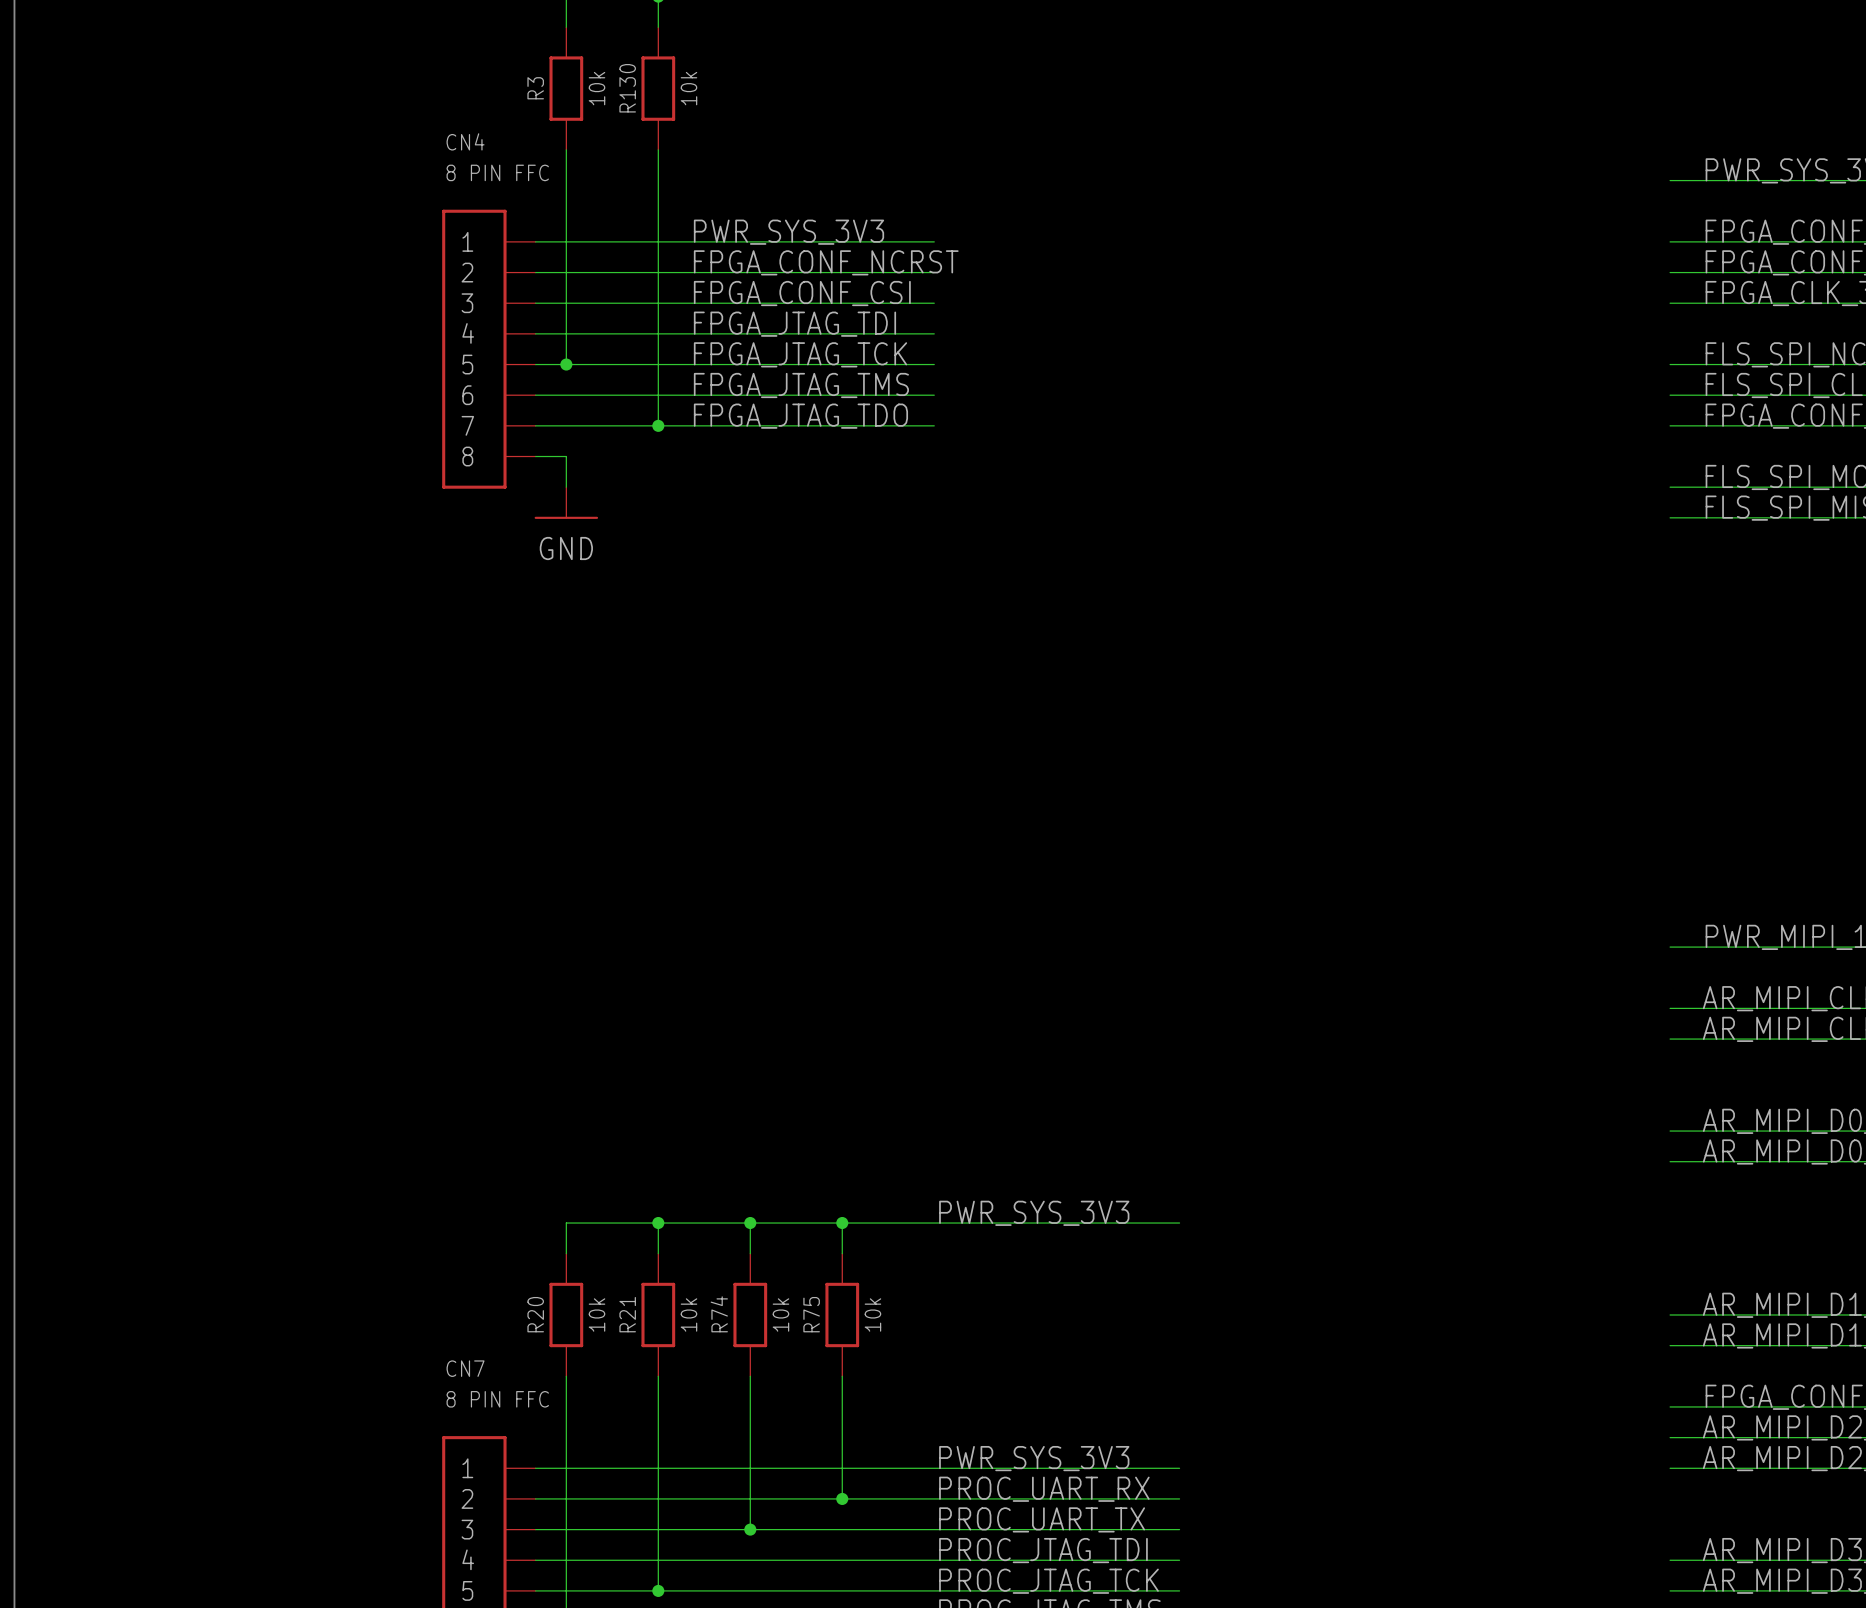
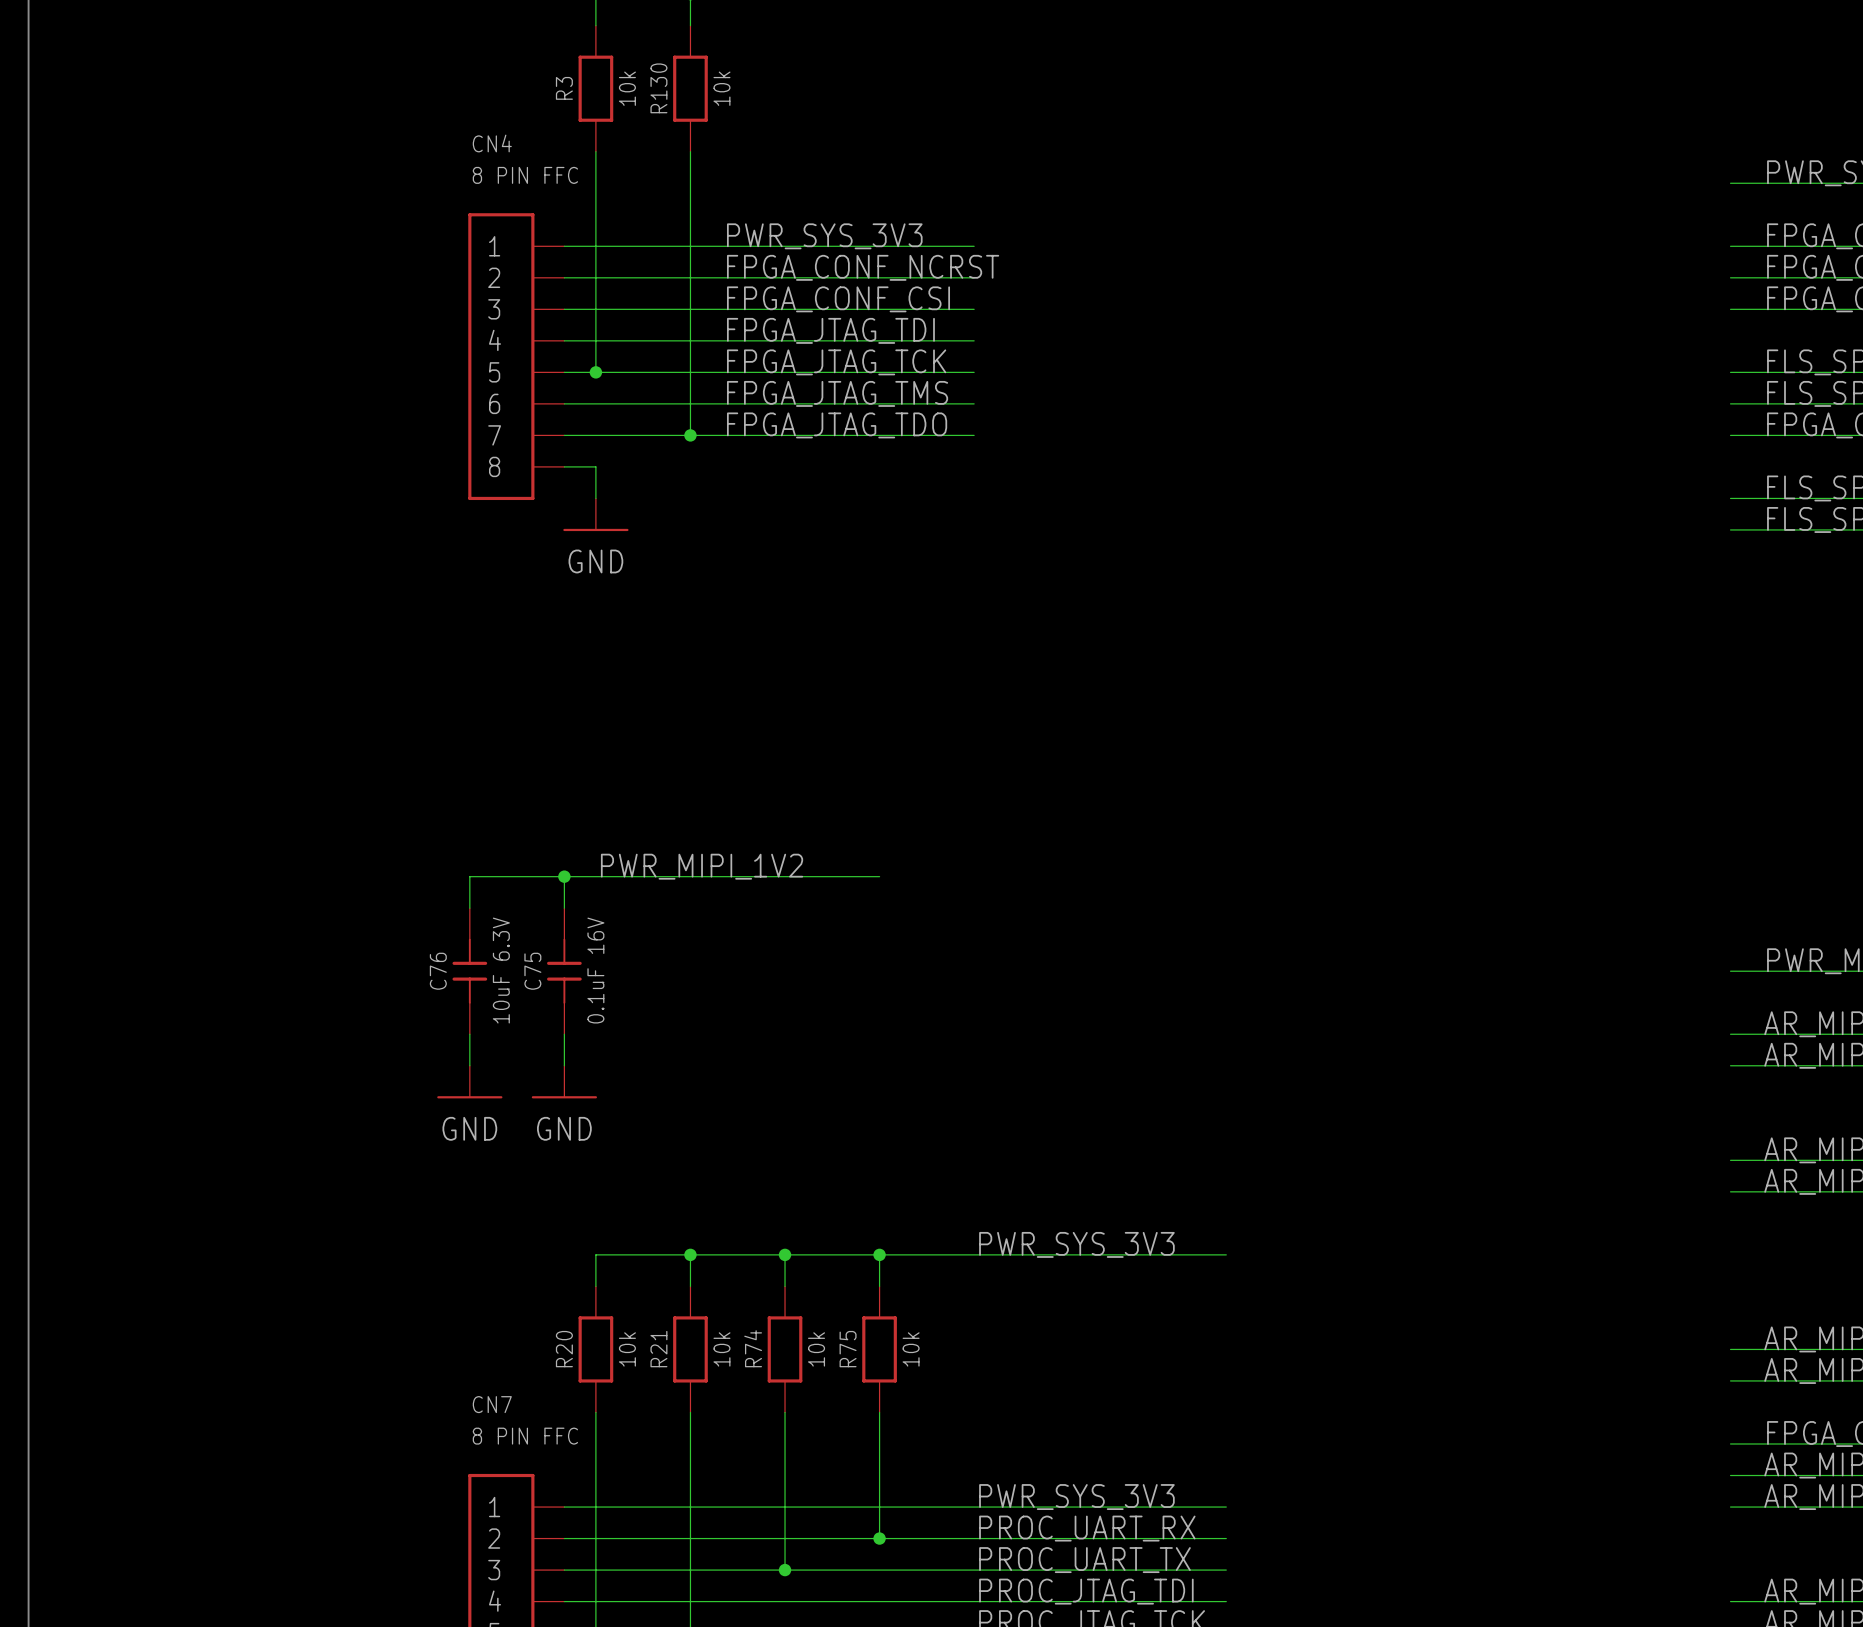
label: none -> PWR_MIPI_1V2 (702, 866)
wire: none -> (564, 876) (564, 908)
junction: none -> (564, 876)
wire: none -> (879, 876) (469, 876) (469, 908)
C76: none -> 10uF 6.3V (469, 971)
C75: none -> 0.1uF 16V (564, 971)
wire: none -> (469, 1034) (469, 1065)
wire: none -> (564, 1034) (564, 1065)
power symbol: none -> GND (469, 1082)
power symbol: none -> GND (564, 1082)

